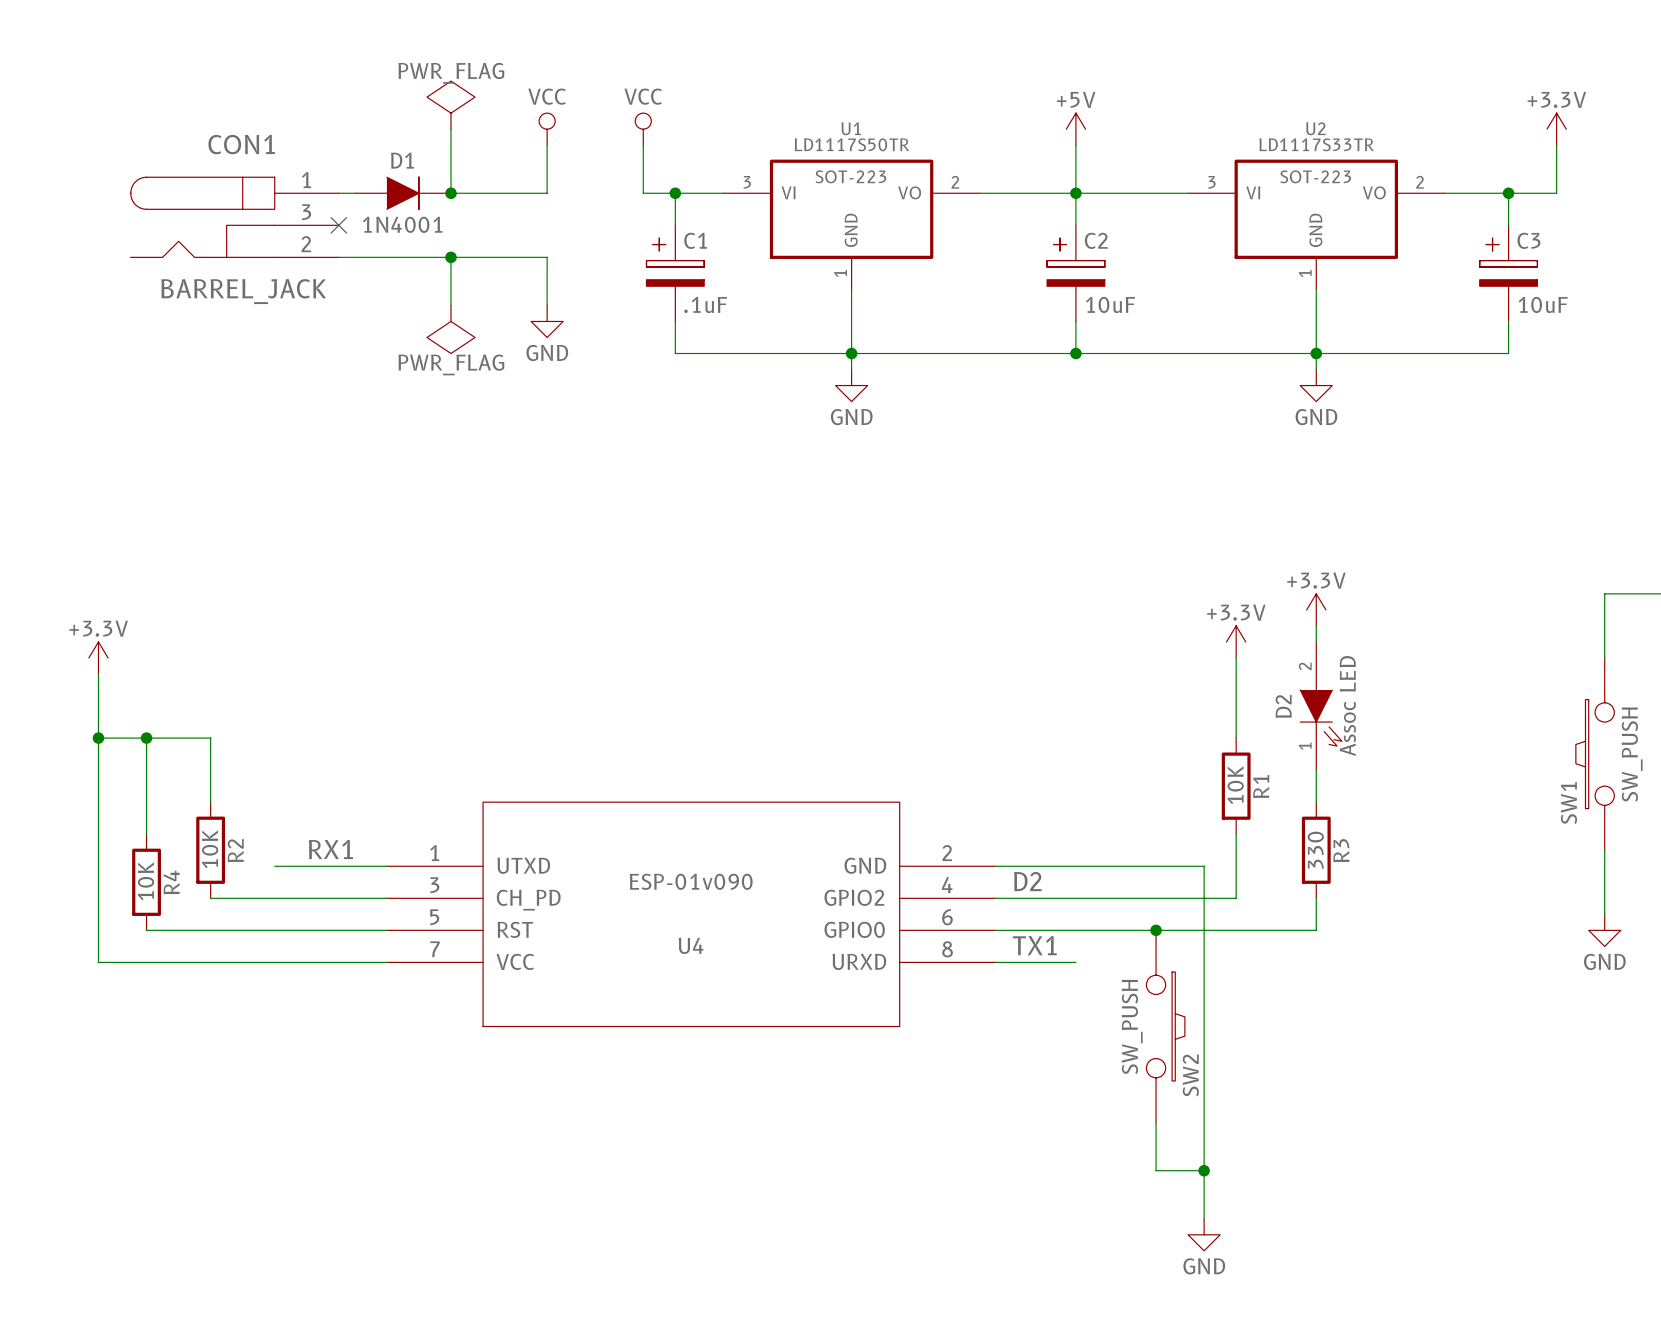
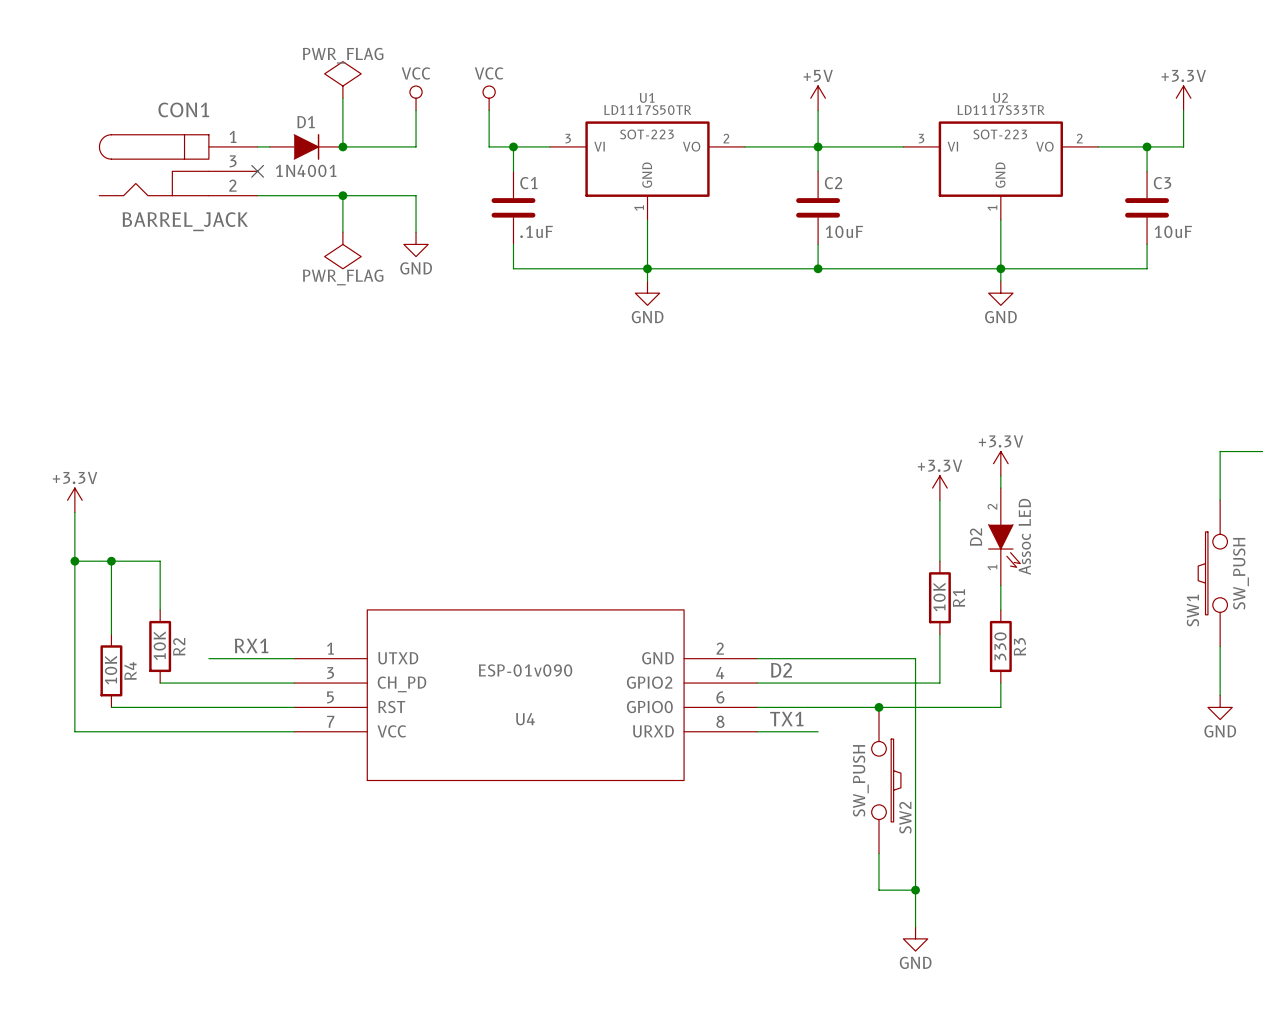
C1 symbol: [646, 225, 705, 322] -> [491, 171, 536, 245]
C2 symbol: [1047, 225, 1105, 322] -> [796, 171, 841, 245]
C3 symbol: [1479, 225, 1538, 322] -> [1125, 171, 1169, 245]

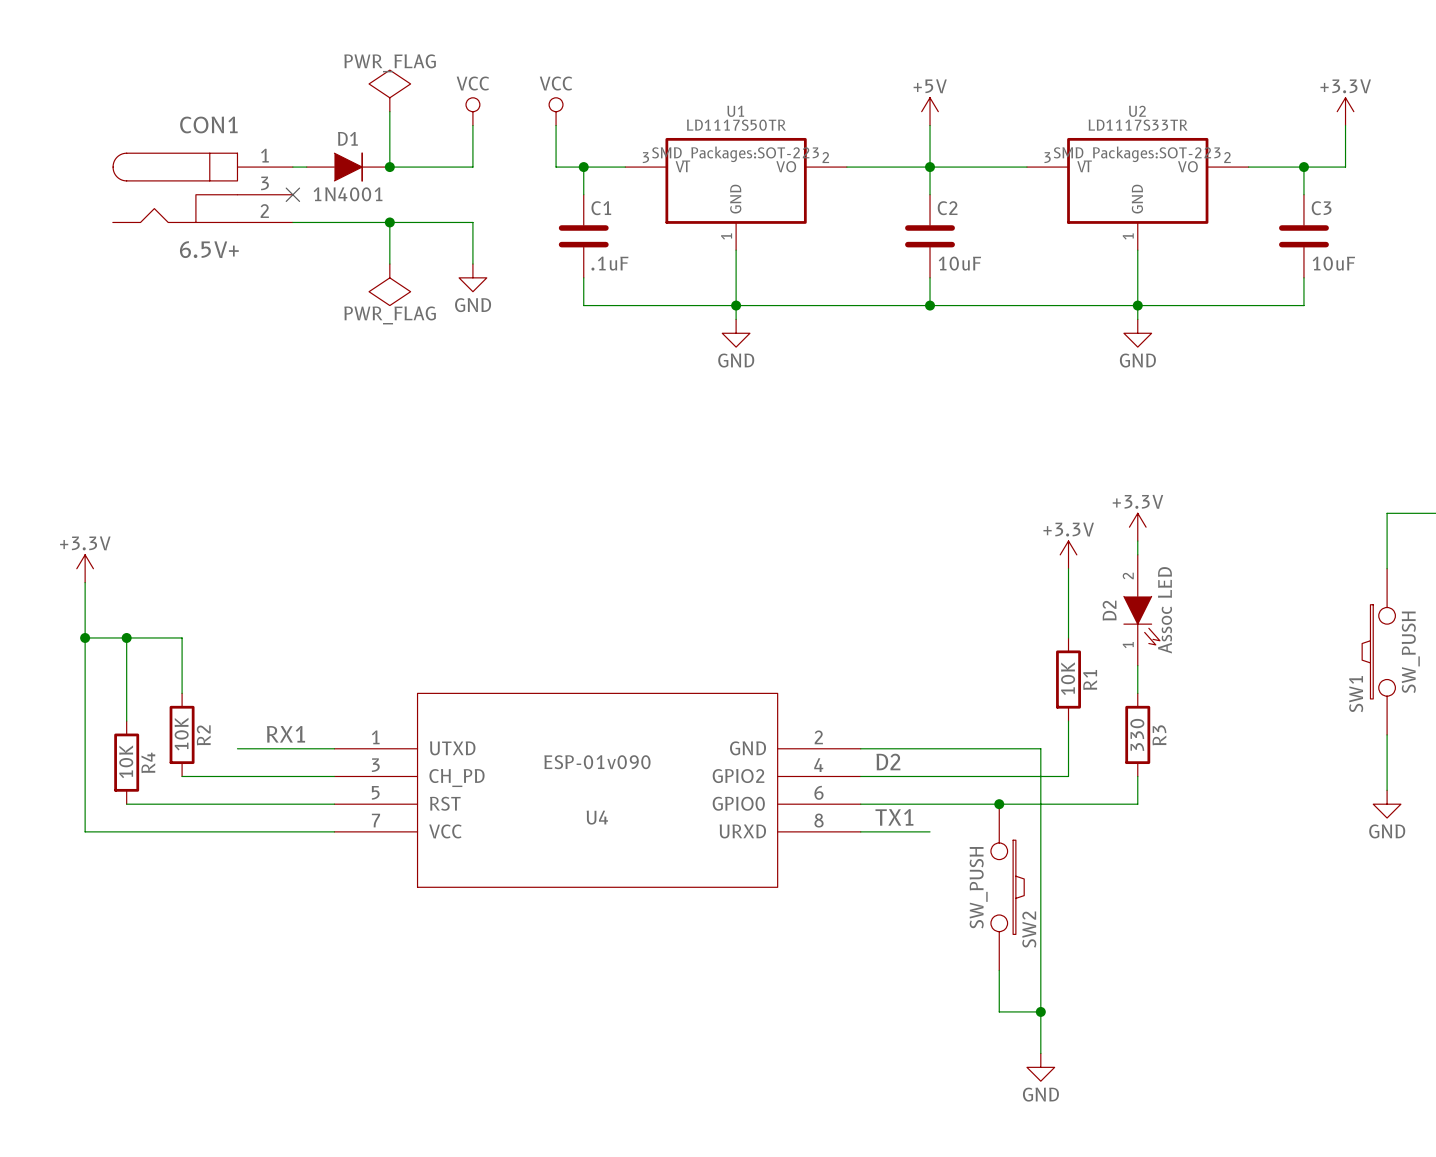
U1 text: SOT-223 (646, 134) -> SMD_Packages:SOT-223 (735, 154)
U2 text: SOT-223 (1000, 134) -> SMD_Packages:SOT-223 (1137, 154)
CON1 value: BARREL_JACK (185, 221) -> 6.5V+ (209, 249)

